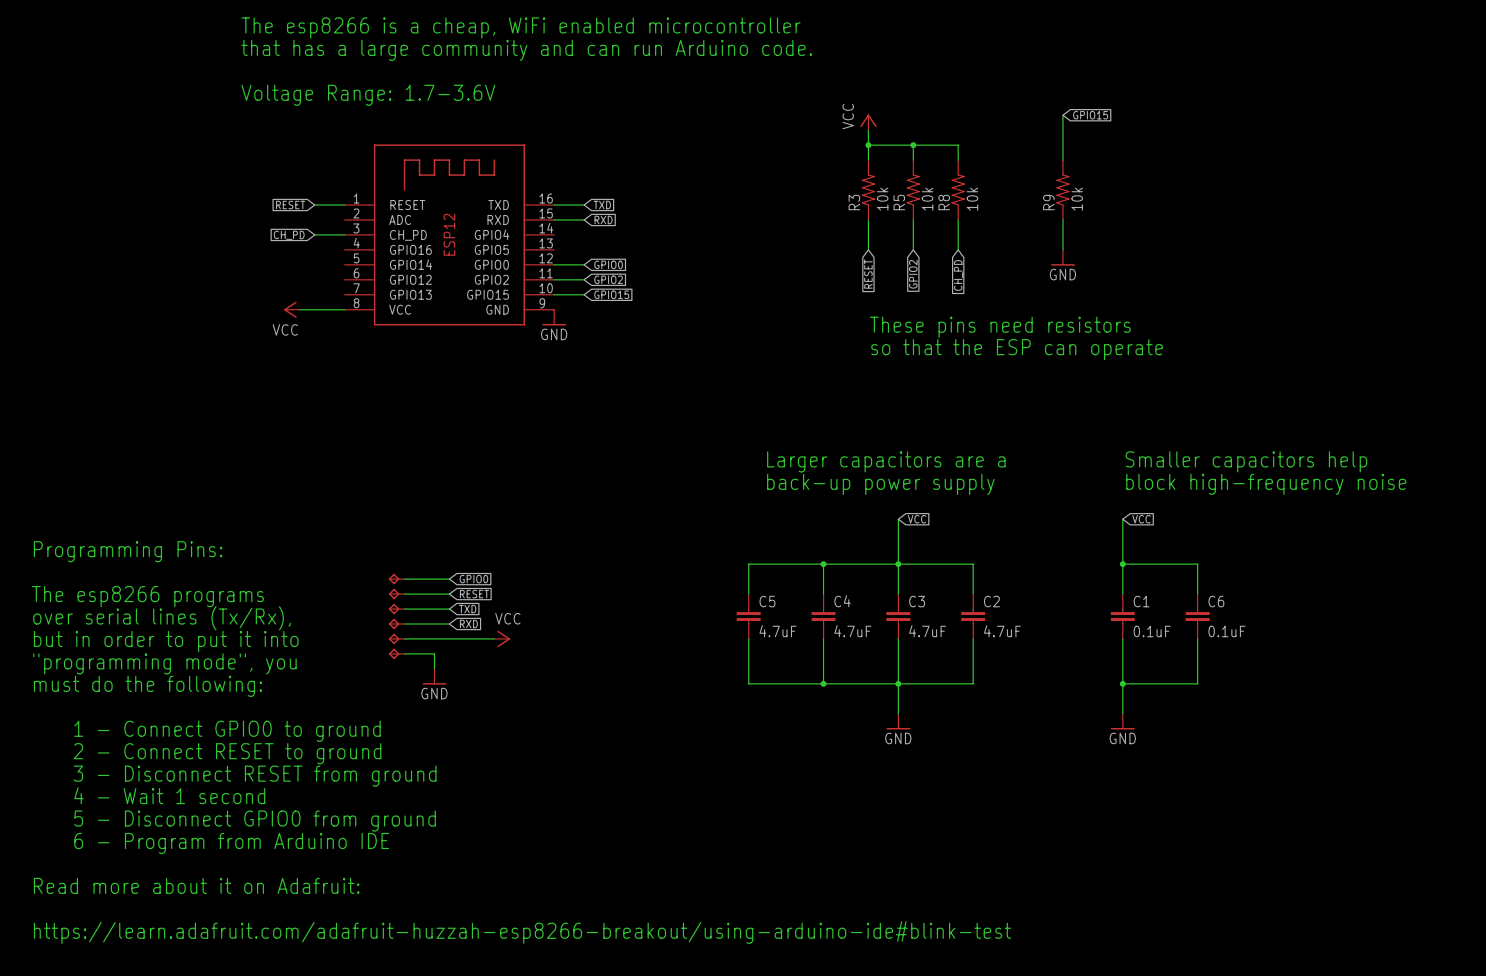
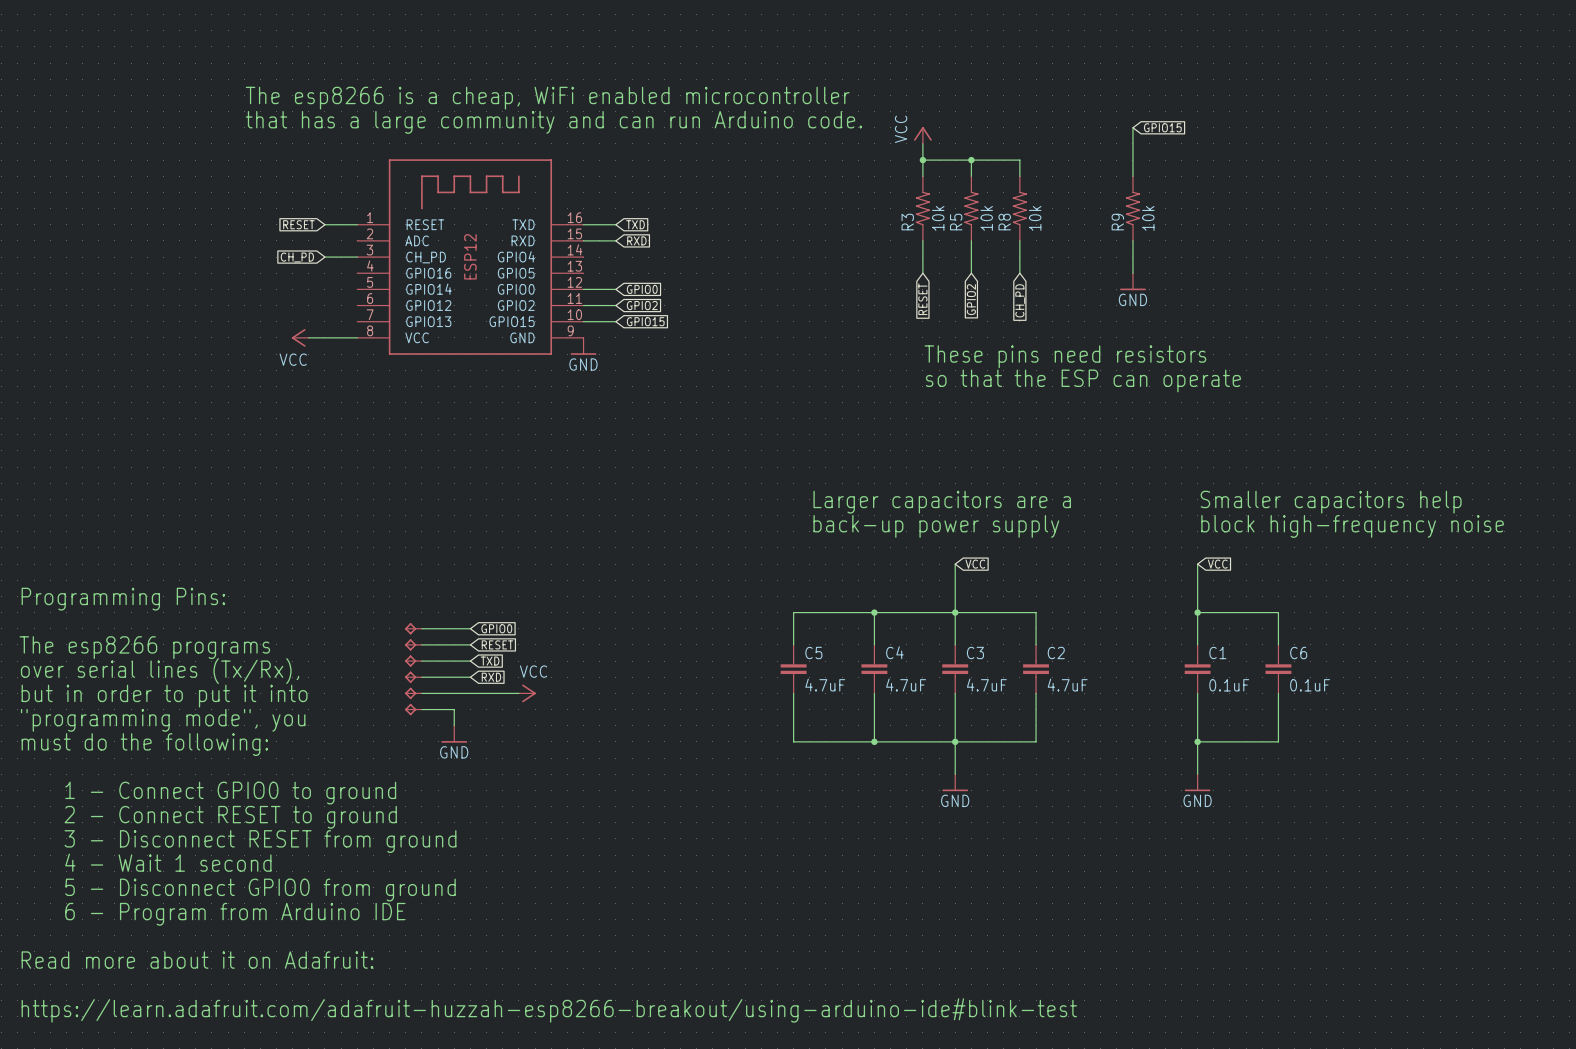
text position: The esp8266 is a cheap, WiFi enabled microcontroller (520, 27) -> The esp8266 is a cheap, WiFi enabled microcontroller (547, 98)
text position: that has a large community and can run Arduino code. (526, 50) -> that has a large community and can run Arduino code. (553, 122)
text: Voltage Range: 1.7-3.6V (368, 95) -> none

